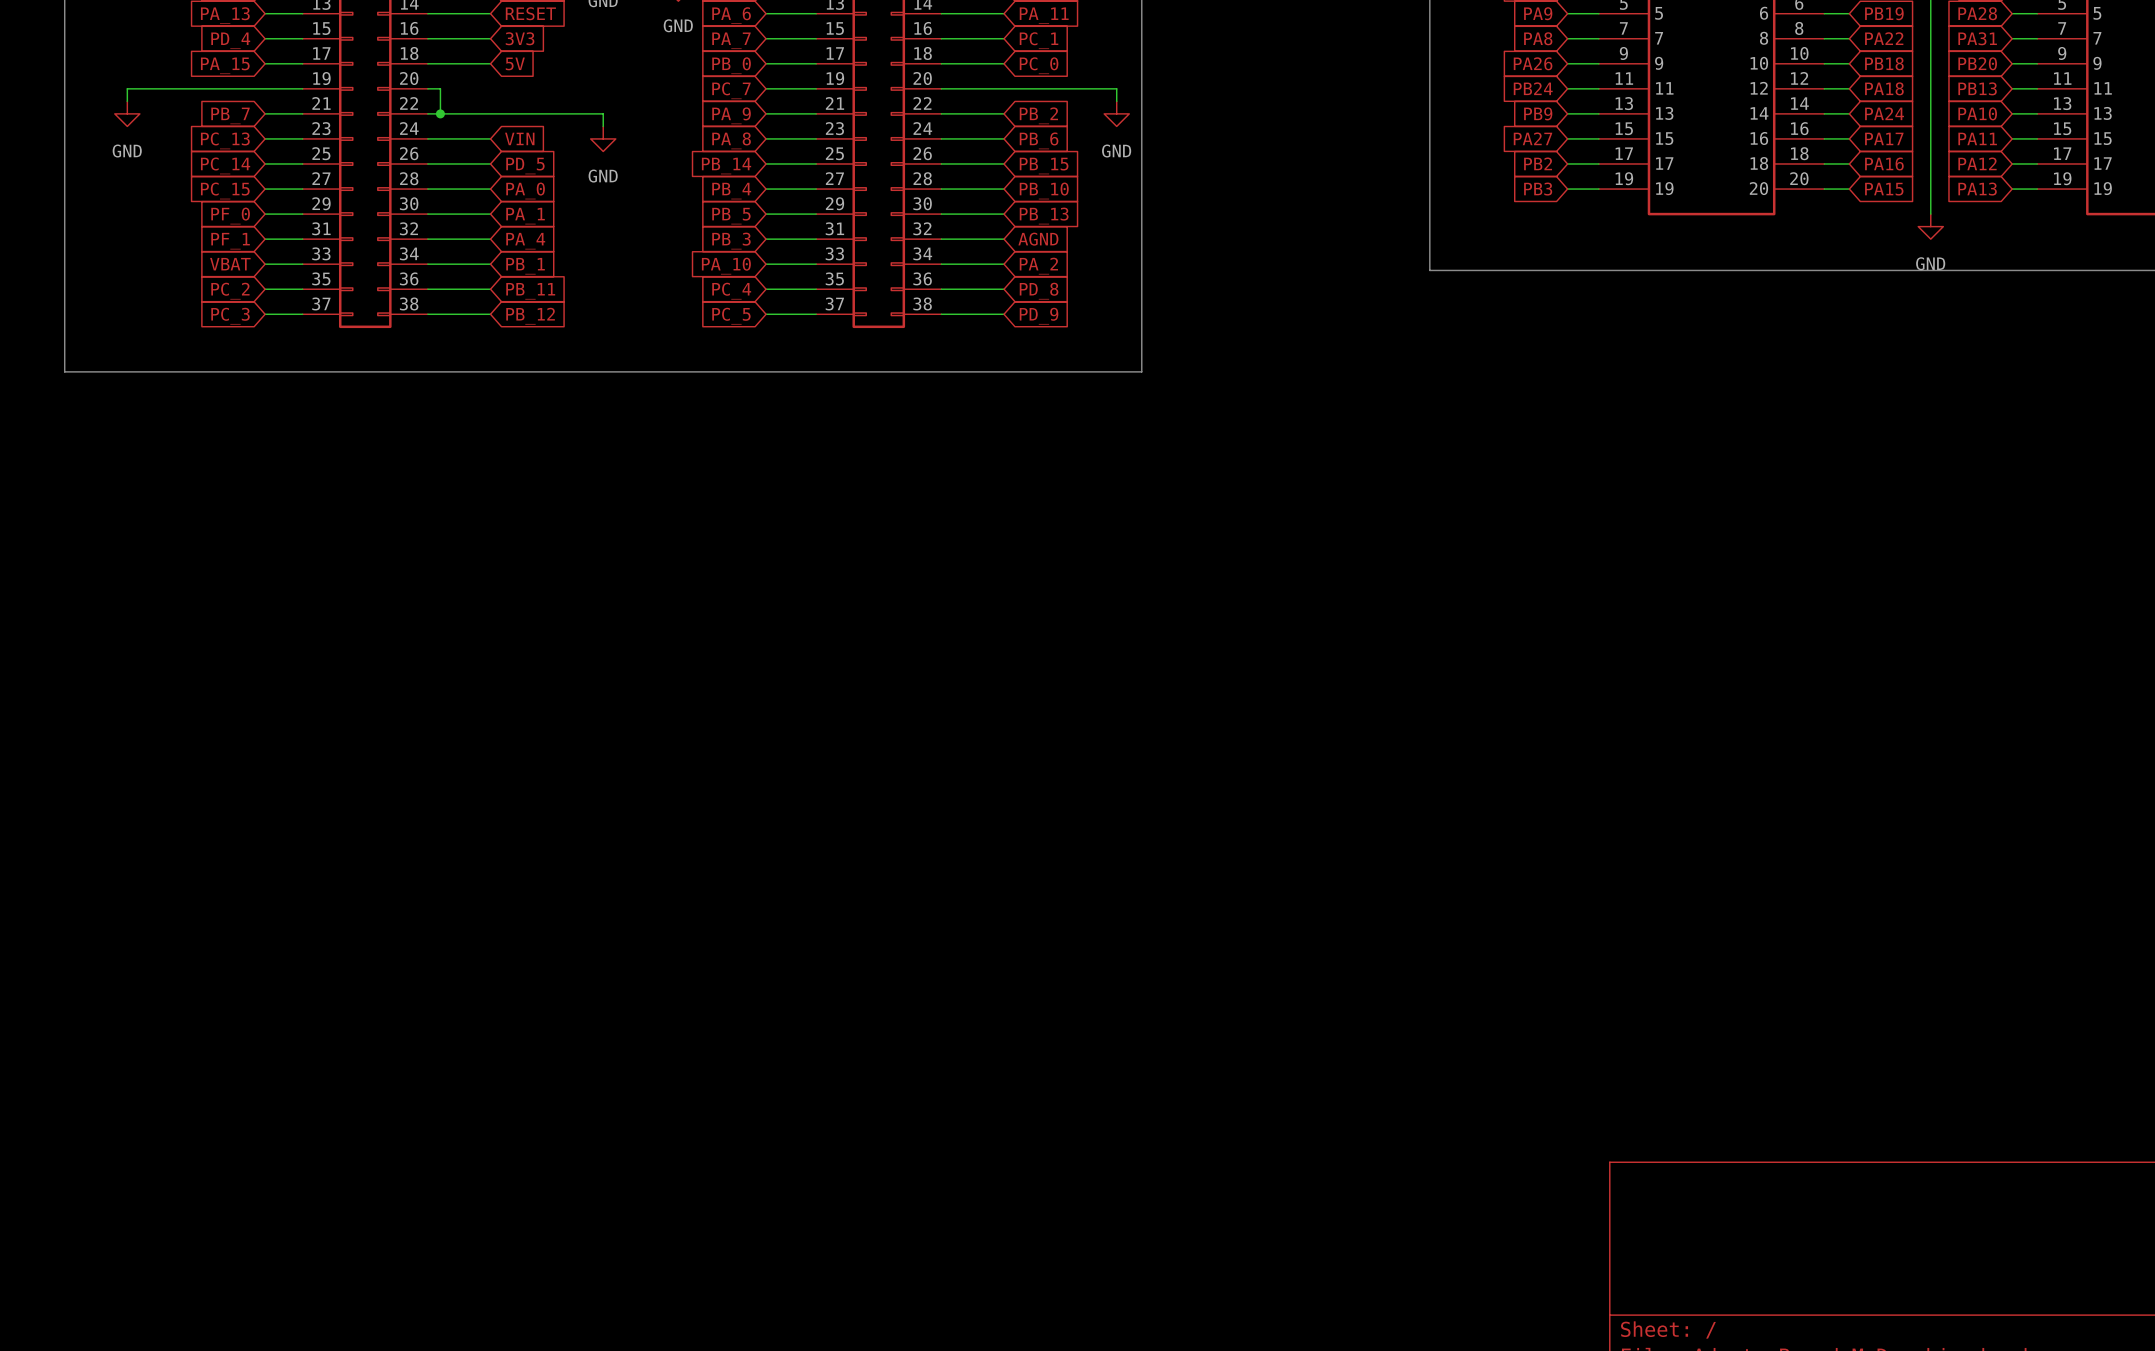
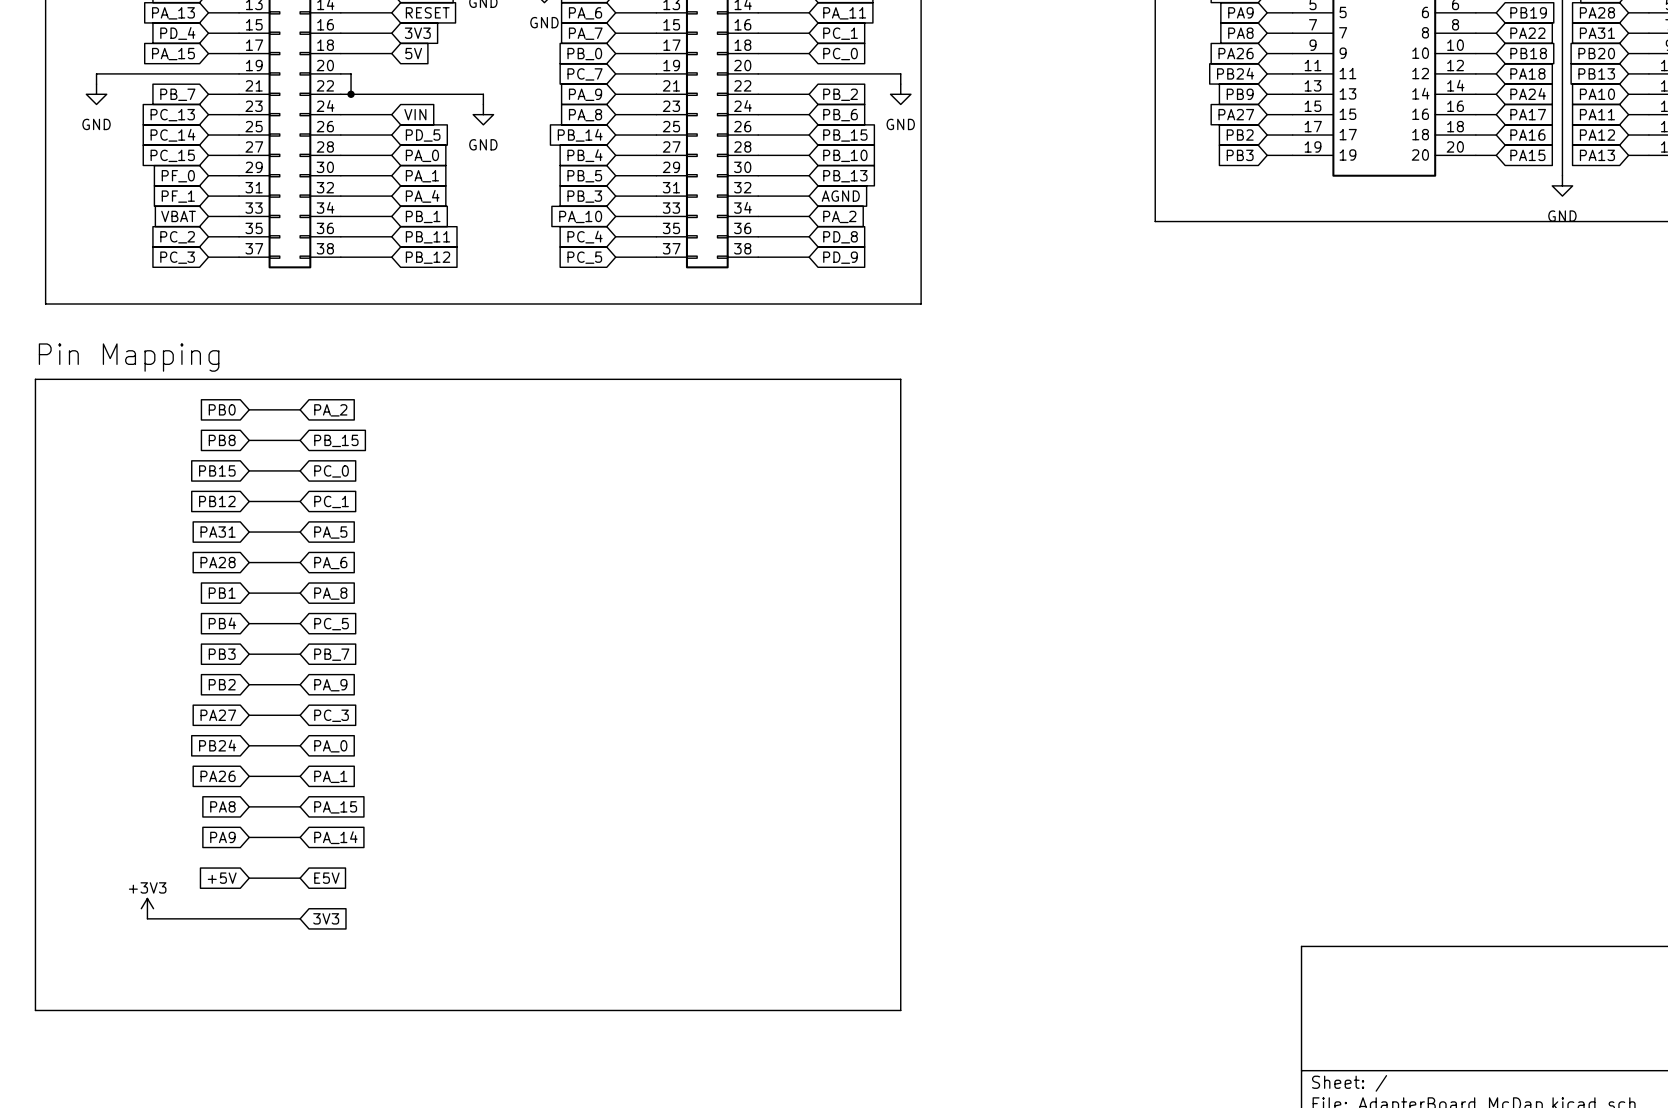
text: none -> Pin Mapping (129, 357)
line: none -> (35, 379) (900, 379) (900, 1010) (35, 1010) (35, 379)
global label: none -> PB0 (222, 409)
wire: none -> (249, 409) (300, 409)
global label: none -> PA_2 (330, 410)
global label: none -> PB8 (222, 440)
wire: none -> (249, 440) (300, 440)
global label: none -> PB_15 (336, 440)
global label: none -> PB15 (217, 470)
wire: none -> (249, 470) (300, 470)
global label: none -> PC_0 (331, 471)
global label: none -> PB12 (217, 501)
wire: none -> (249, 501) (300, 501)
global label: none -> PC_1 (331, 501)
global label: none -> PA31 (218, 532)
wire: none -> (249, 532) (300, 532)
global label: none -> PA_5 (330, 532)
global label: none -> PA28 (218, 562)
wire: none -> (249, 562) (300, 562)
global label: none -> PA_6 (330, 563)
global label: none -> PB1 (222, 593)
wire: none -> (249, 593) (300, 593)
global label: none -> PA_8 (330, 593)
global label: none -> PB4 (222, 623)
wire: none -> (249, 623) (300, 623)
global label: none -> PC_5 (331, 624)
global label: none -> PB3 (222, 654)
wire: none -> (249, 654) (300, 654)
global label: none -> PB_7 (331, 654)
global label: none -> PB2 (222, 684)
wire: none -> (249, 684) (300, 684)
global label: none -> PA_9 (330, 685)
global label: none -> PA27 (218, 715)
wire: none -> (249, 715) (300, 715)
global label: none -> PC_3 (331, 715)
global label: none -> PB24 (217, 745)
wire: none -> (249, 745) (300, 745)
global label: none -> PA_0 (330, 746)
global label: none -> PA26 (218, 776)
wire: none -> (249, 776) (300, 776)
global label: none -> PA_1 (330, 776)
global label: none -> PA8 (222, 806)
wire: none -> (249, 806) (300, 806)
global label: none -> PA_15 (335, 807)
global label: none -> PA9 (222, 837)
wire: none -> (249, 837) (300, 837)
global label: none -> PA_14 (335, 837)
global label: none -> +5V (222, 878)
wire: none -> (249, 878) (300, 878)
global label: none -> E5V (326, 878)
power symbol: none -> +3V3 (147, 908)
wire: none -> (147, 918) (300, 918)
global label: none -> 3V3 (326, 918)

